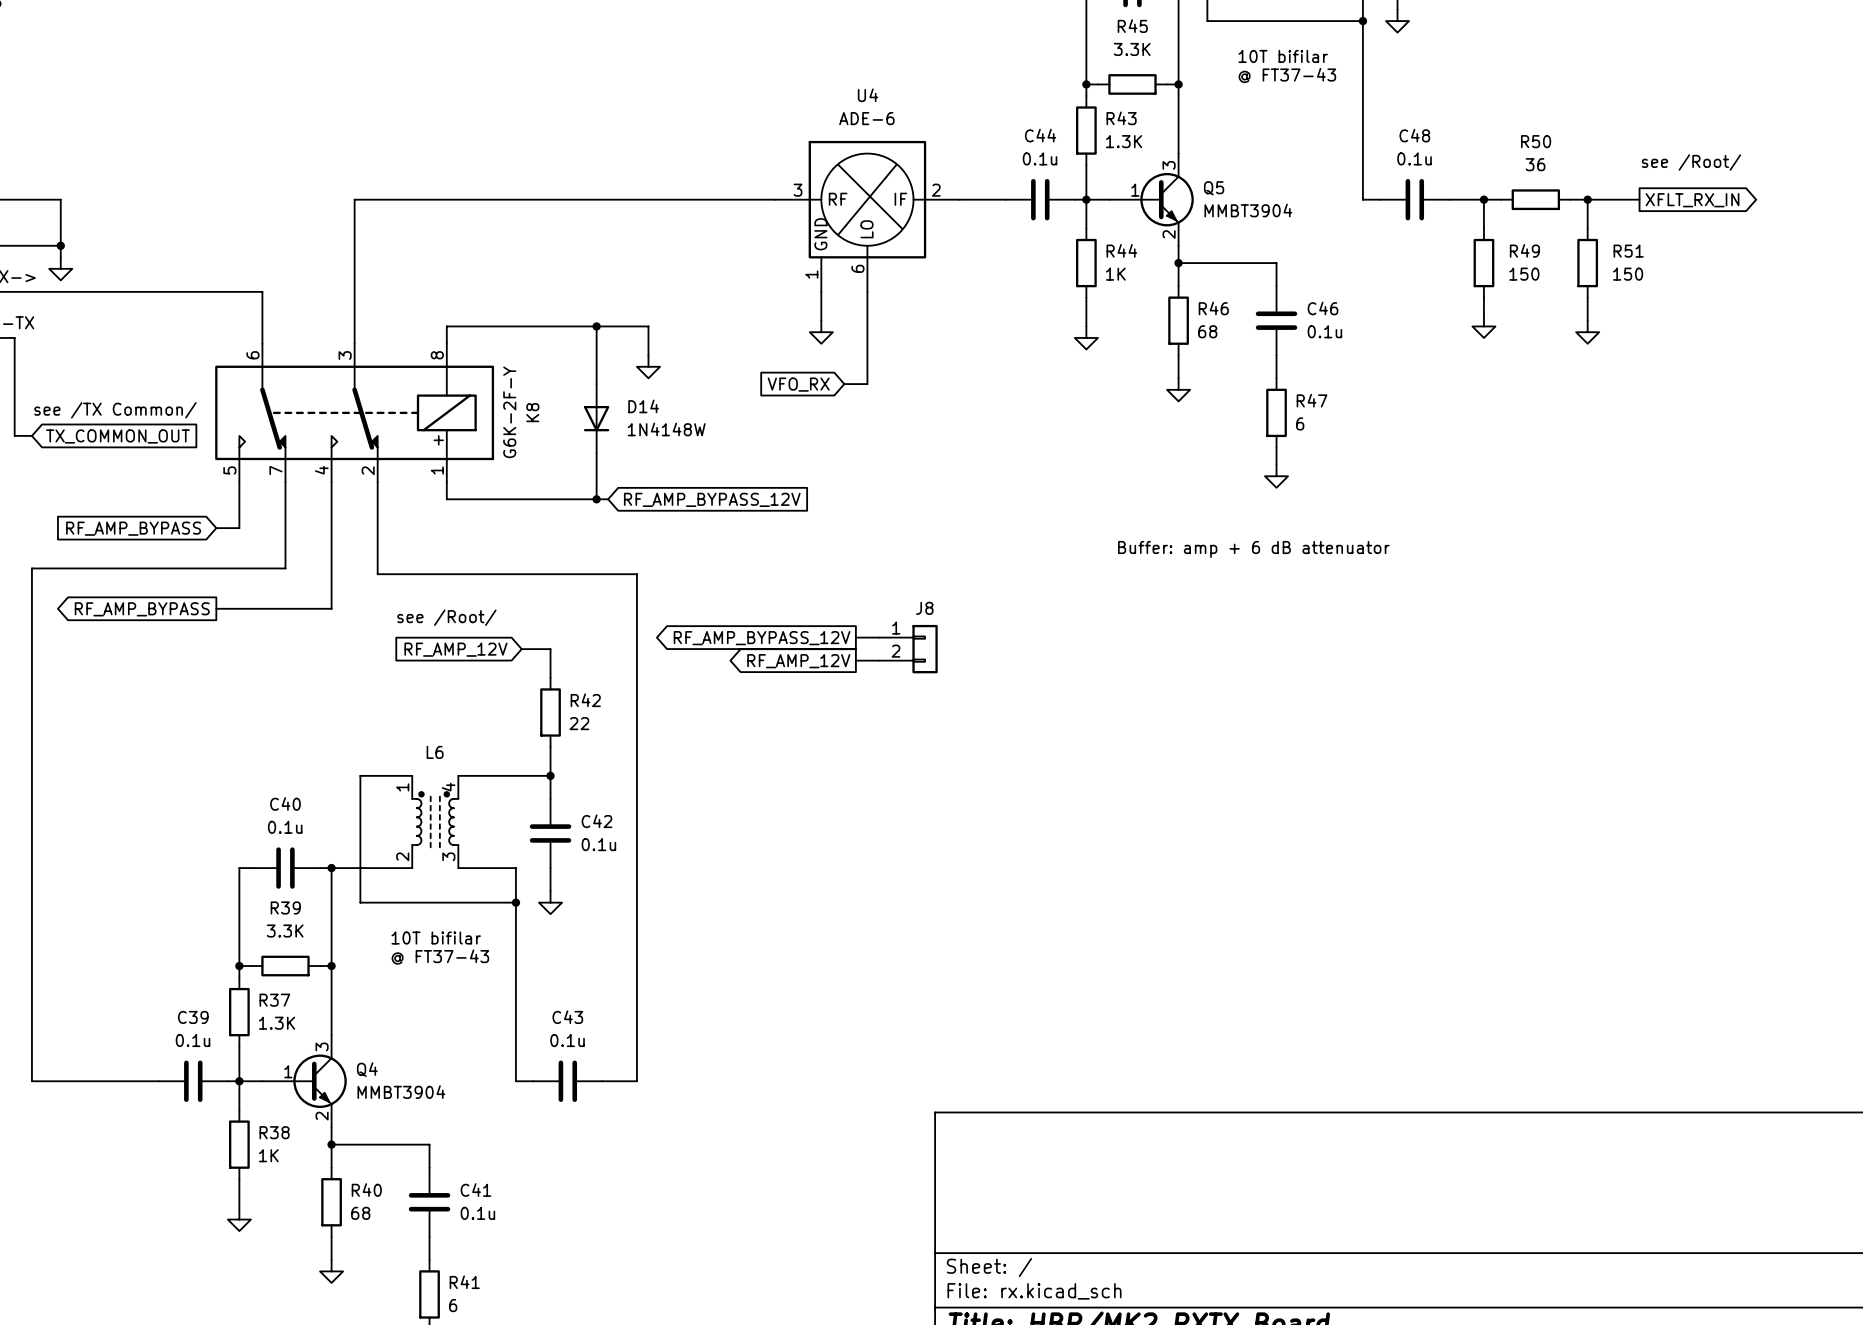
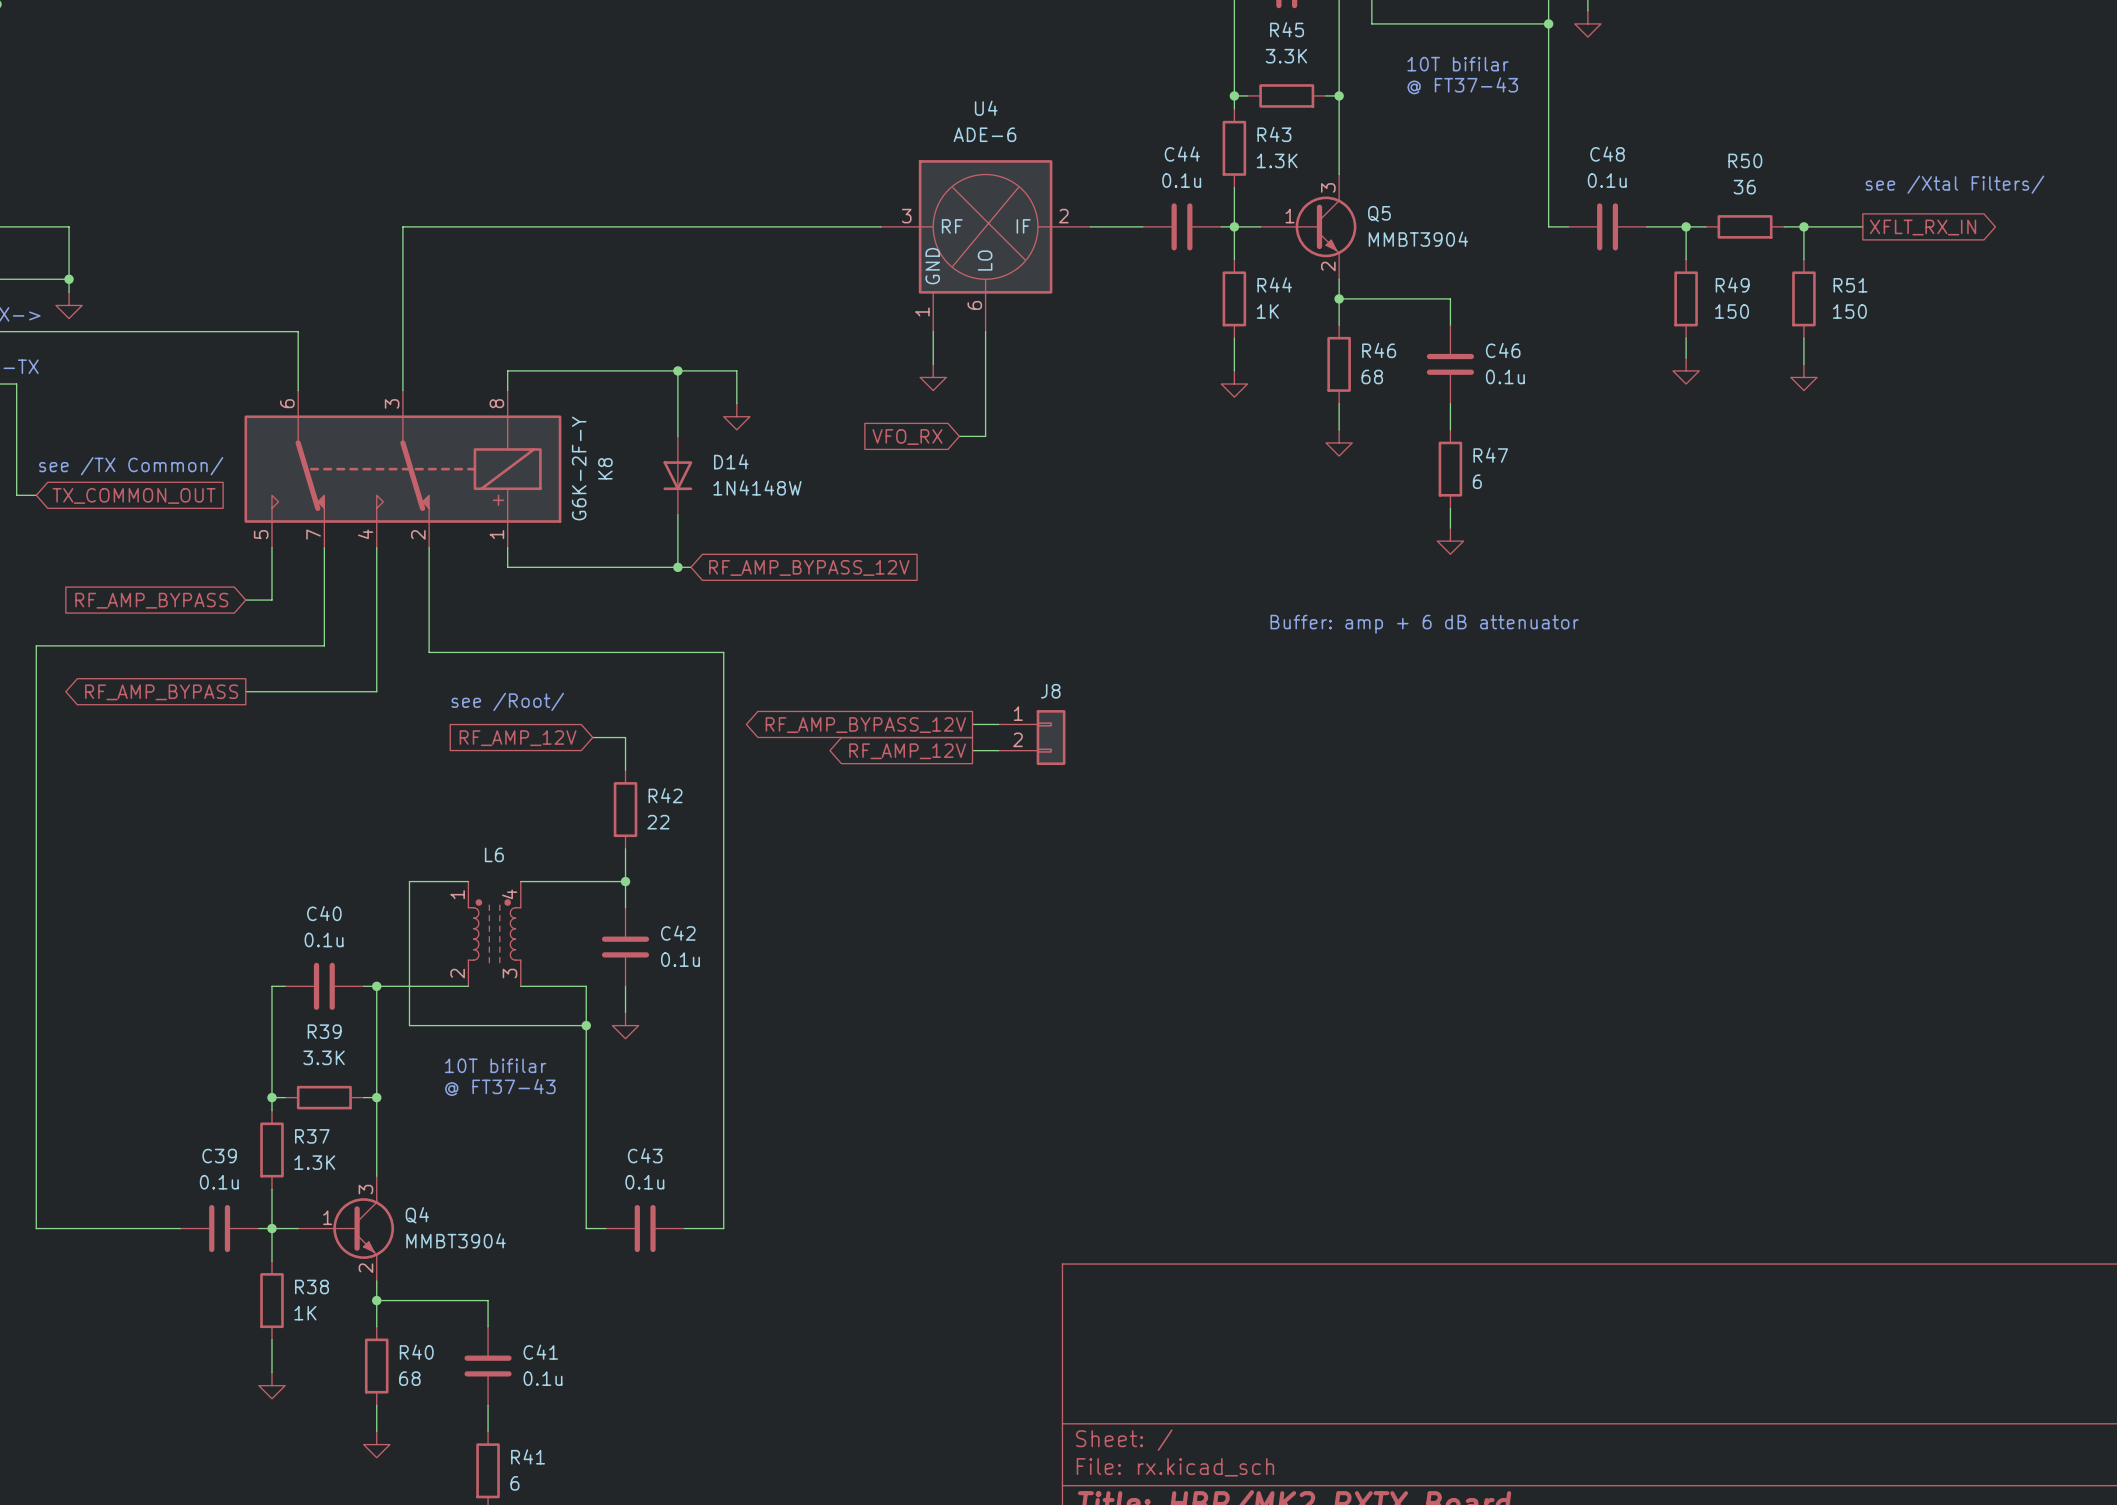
text: see /Root/ (1691, 162) -> see /Xtal Filters/ (1954, 184)

